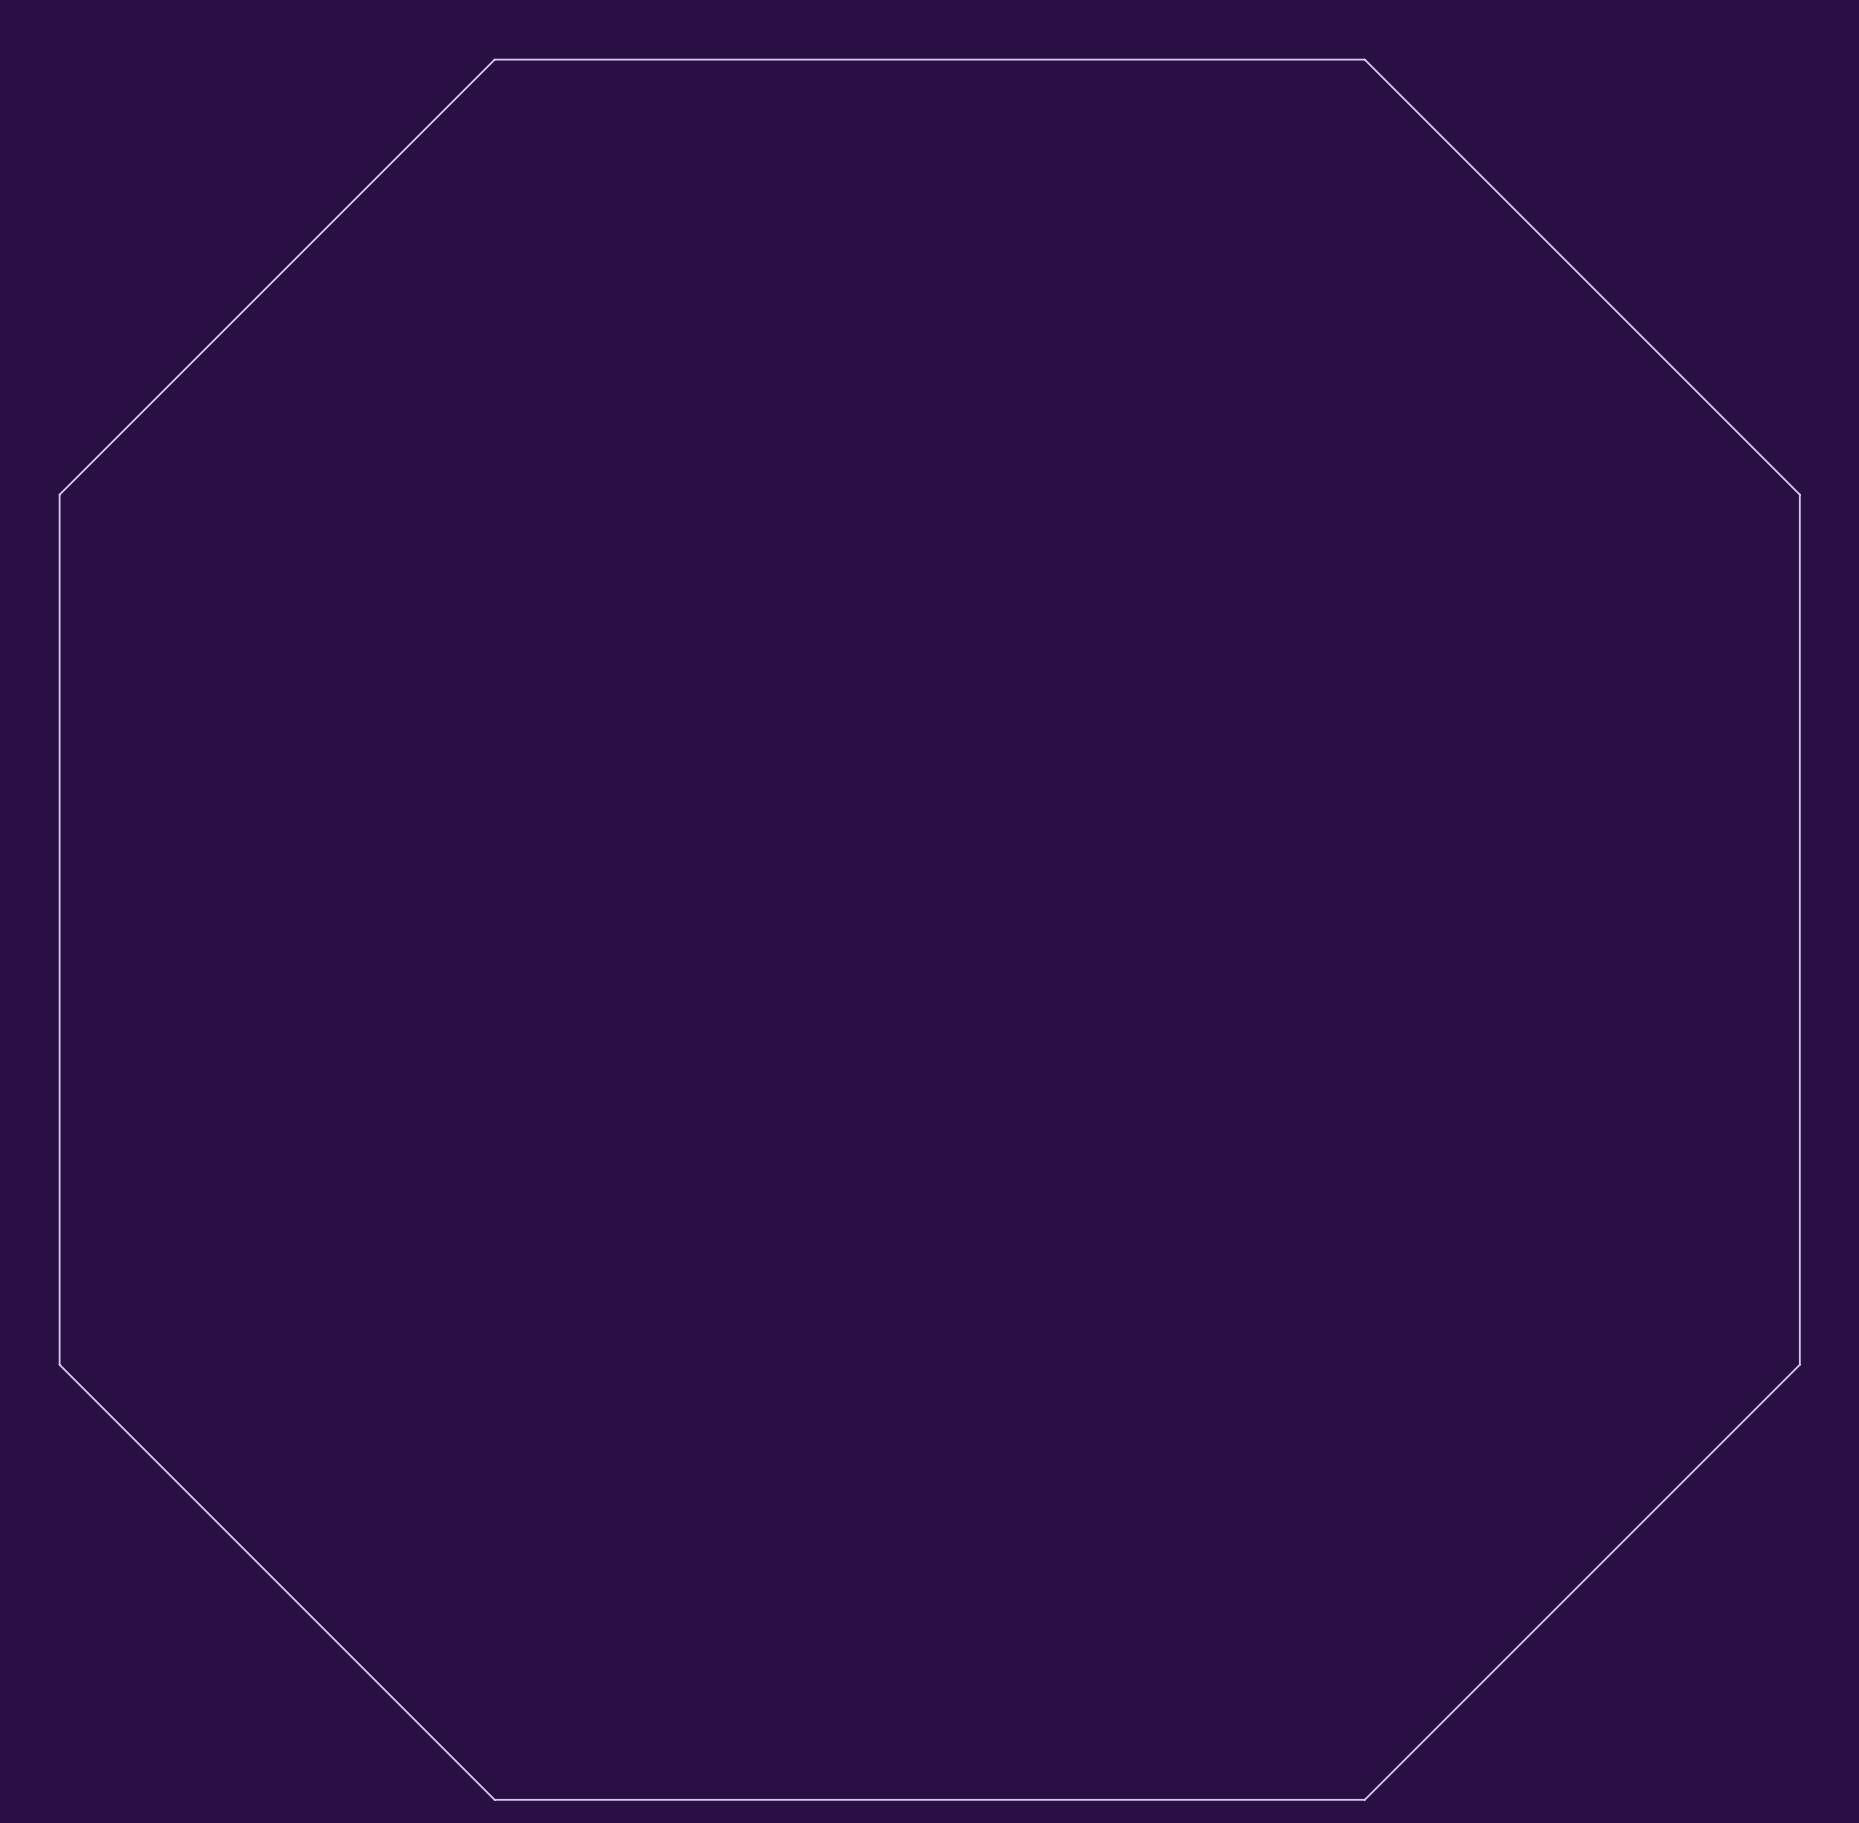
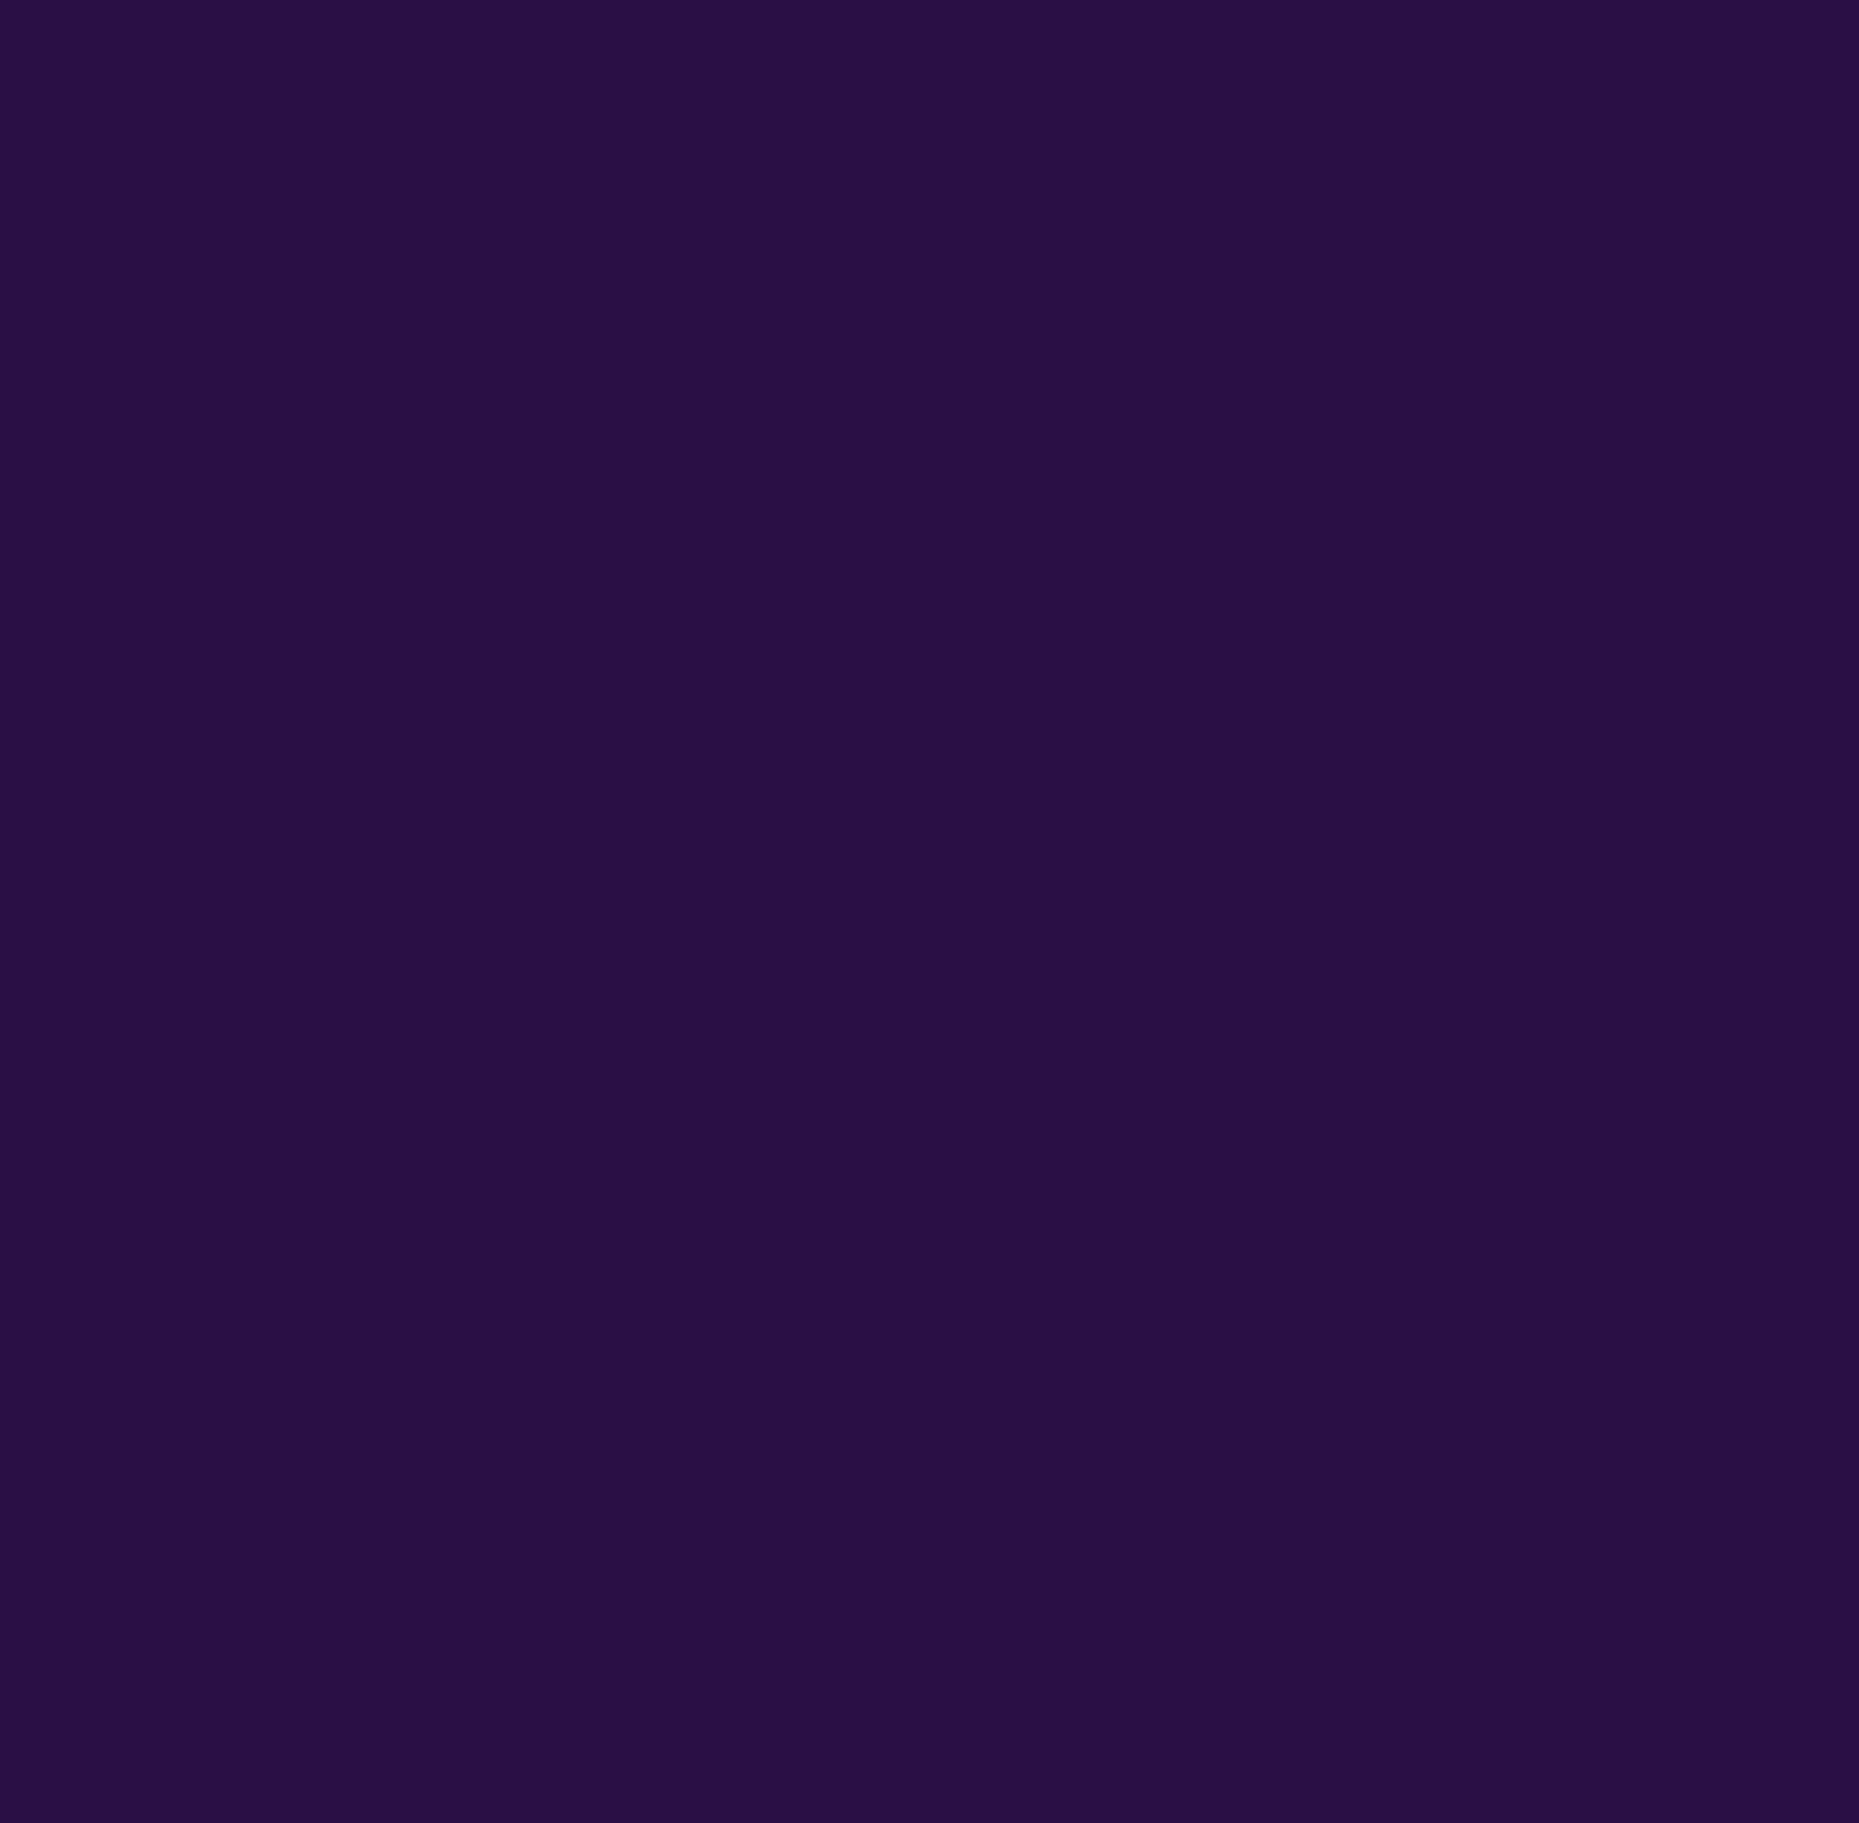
board edge: (494, 59) (1364, 59) (1799, 494) (1799, 1364) (1364, 1799) (494, 1799) (59, 1364) (59, 494) (494, 59) -> none

